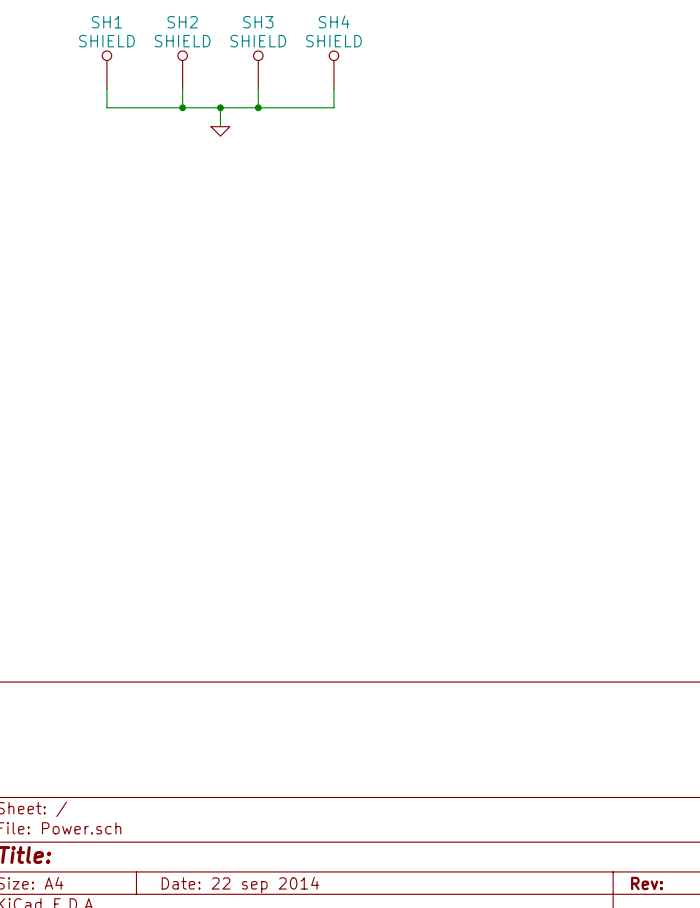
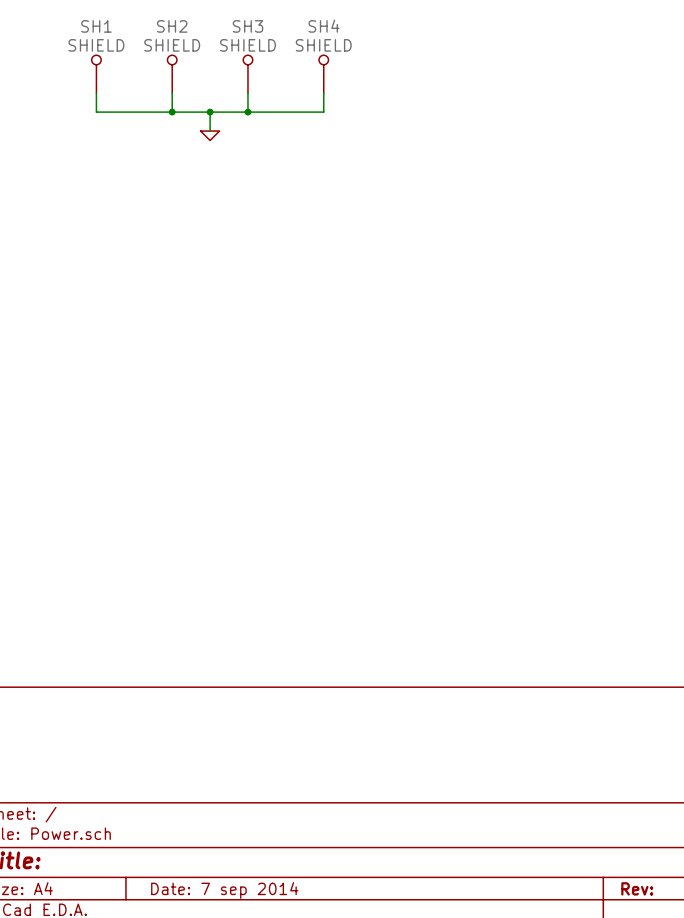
title block: Date: 22 sep 2014 (240, 885) -> Date: 7 sep 2014 (224, 890)

